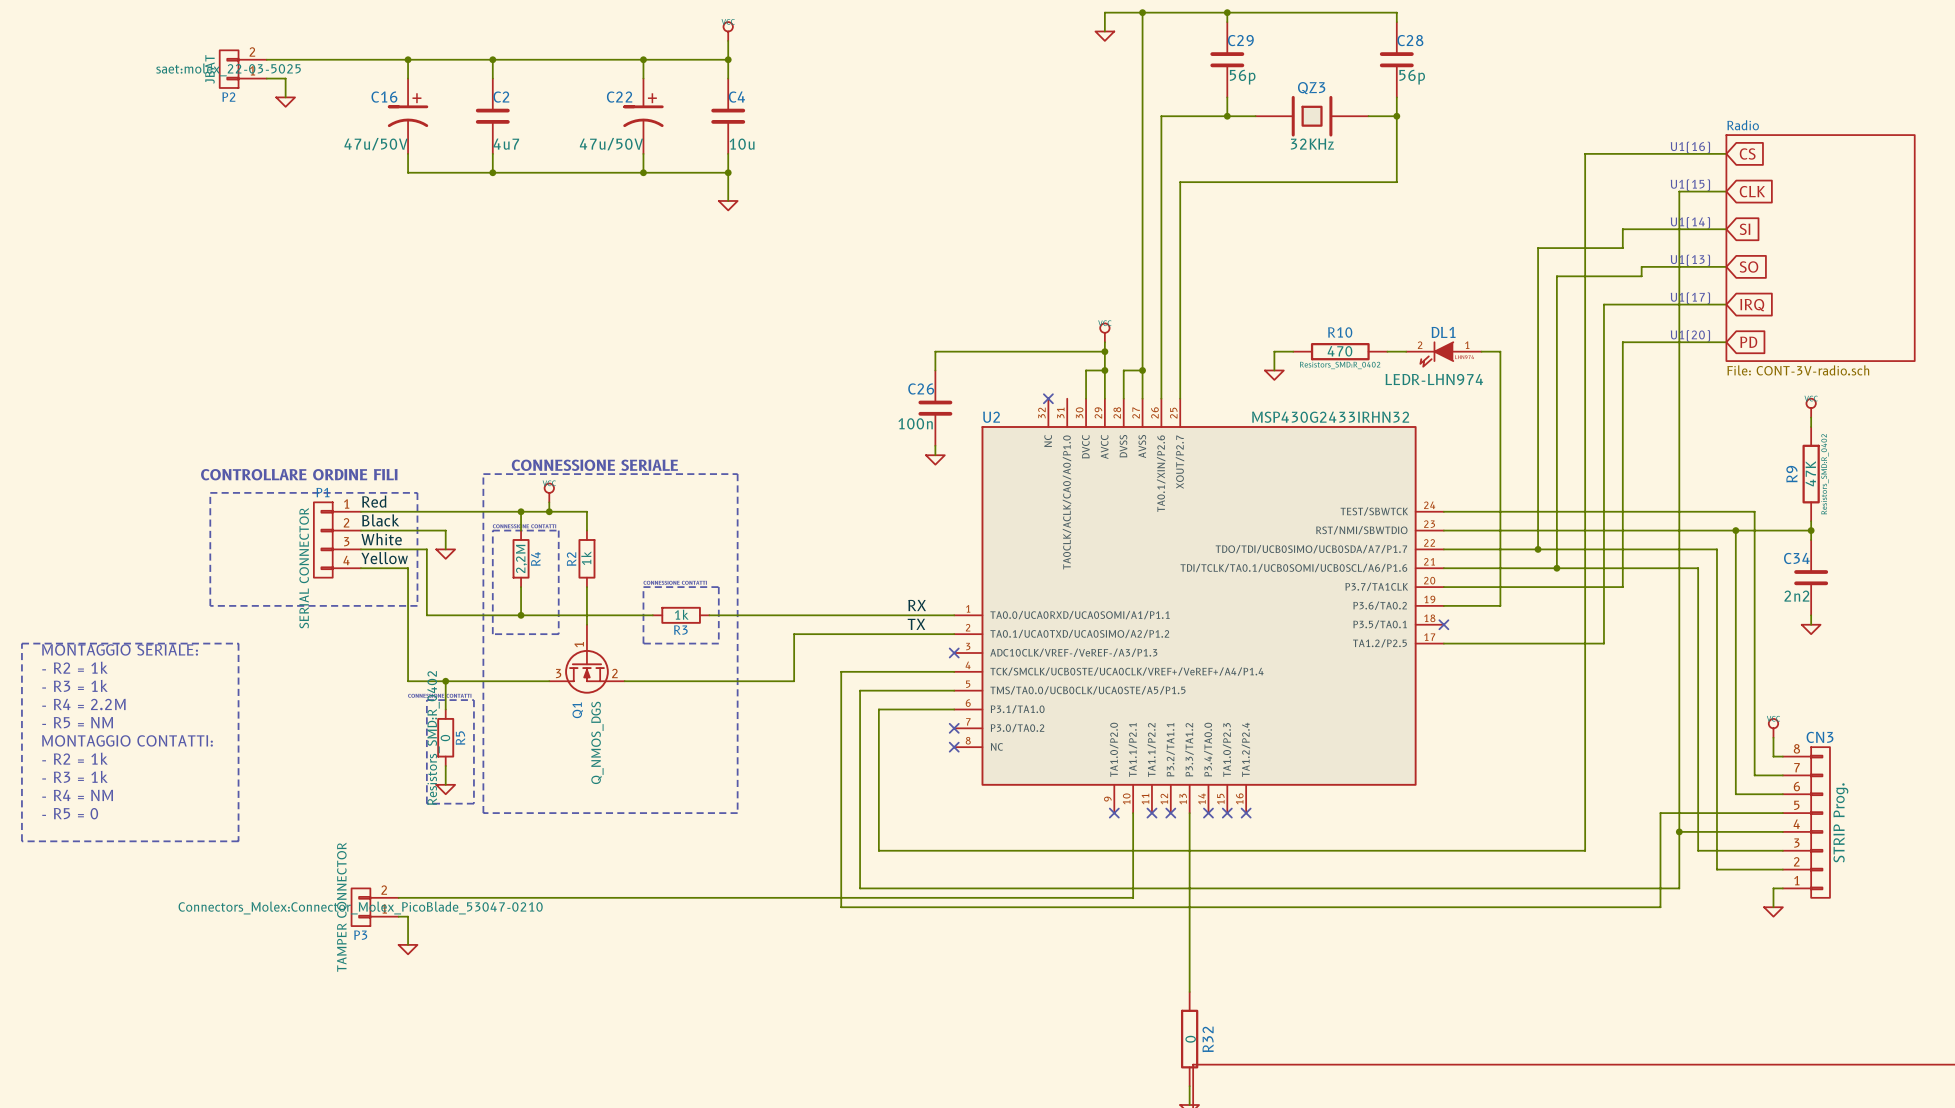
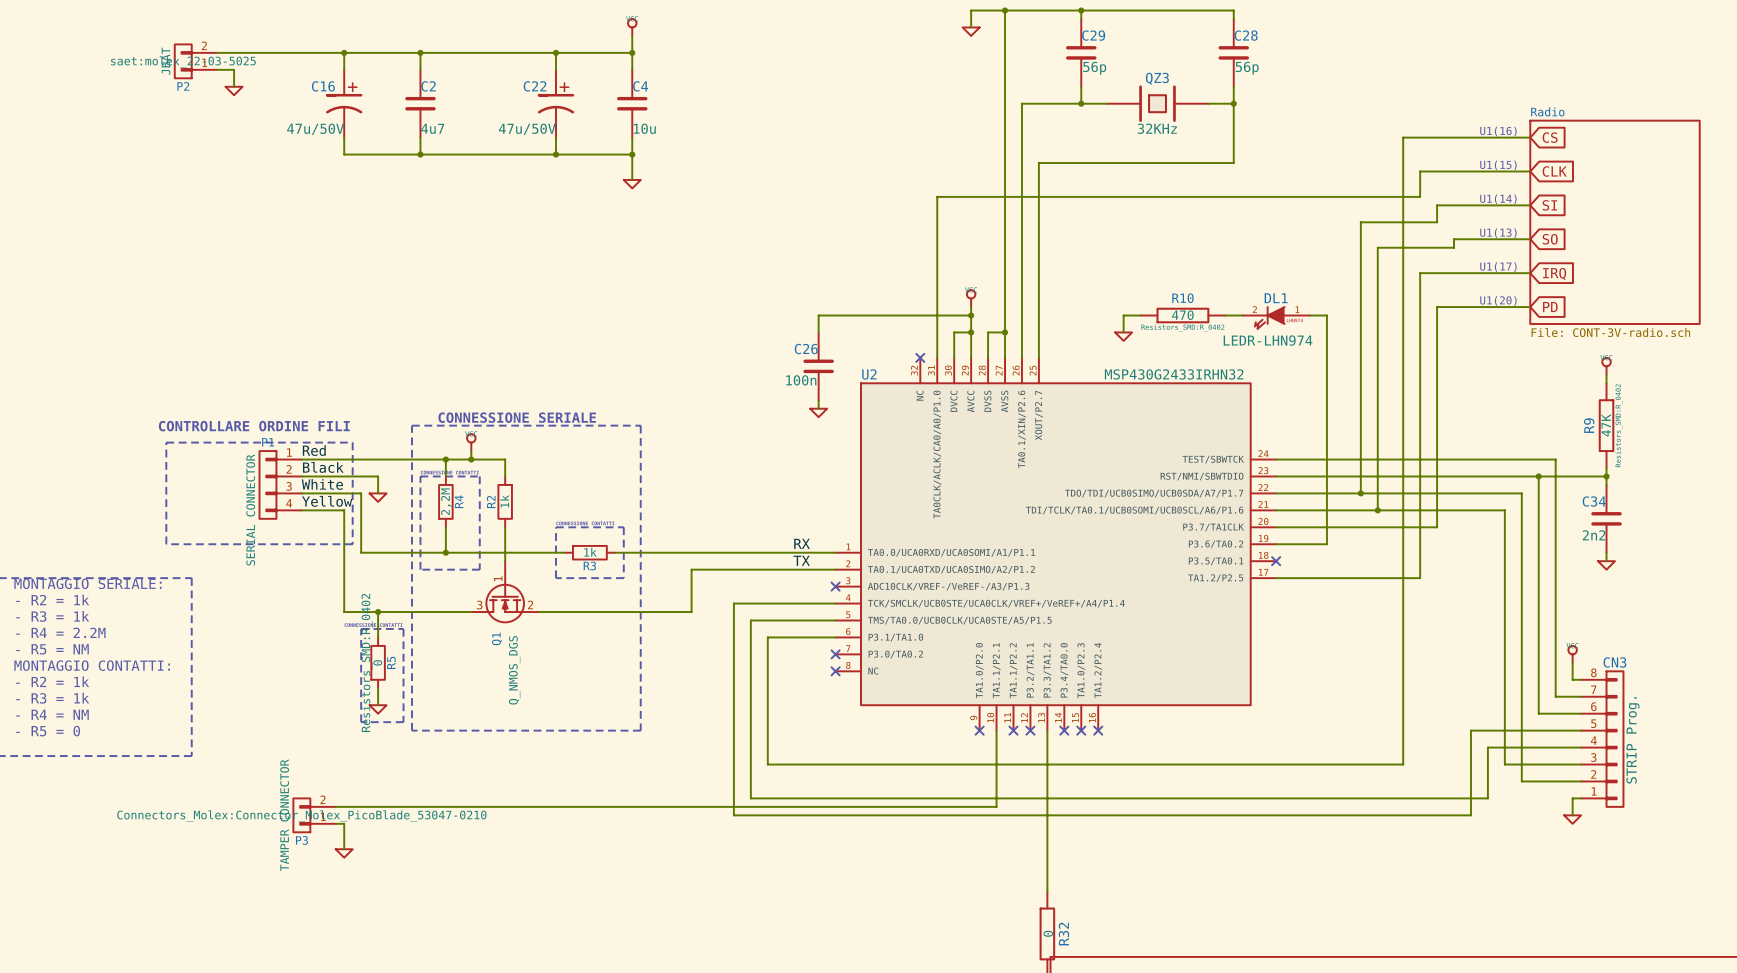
wire: (1679, 191) (1679, 831) -> (1487, 171) (1420, 171) (1420, 196) (937, 196) (937, 357)
junction: (1679, 831) -> none

